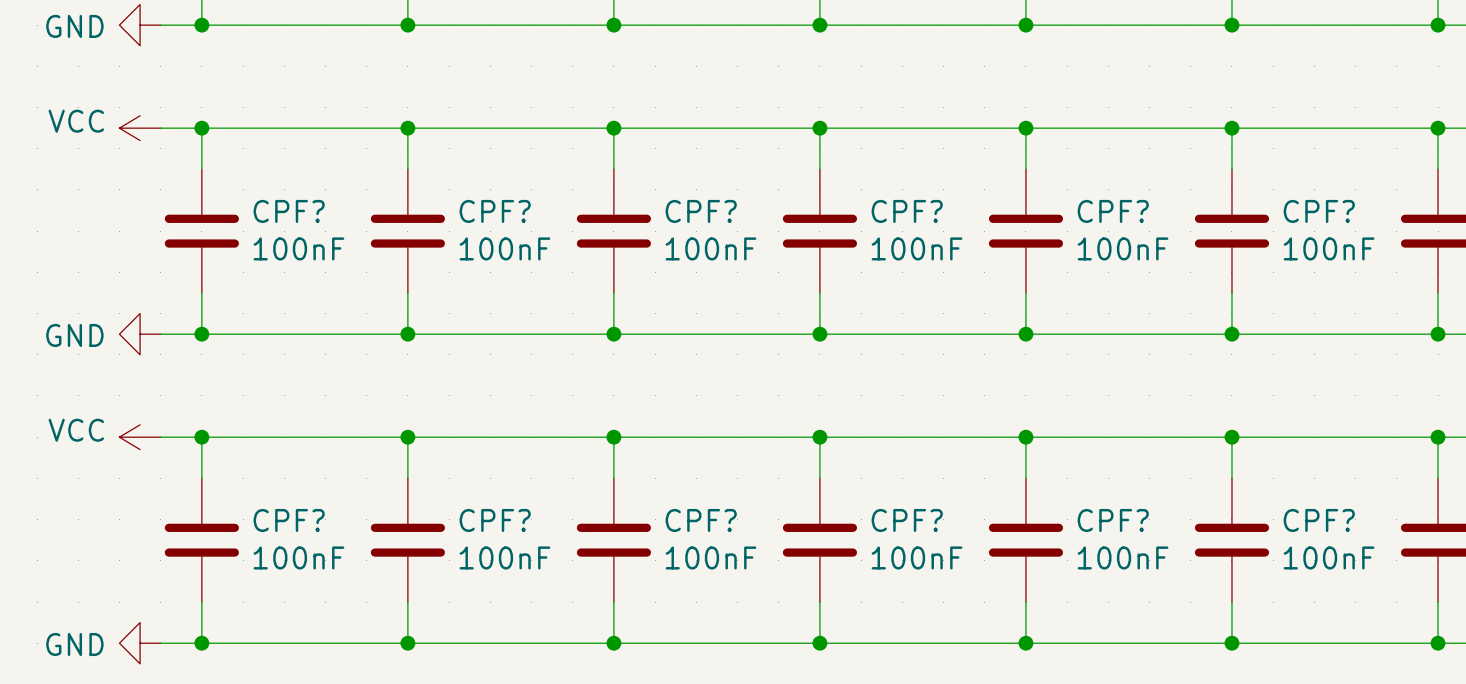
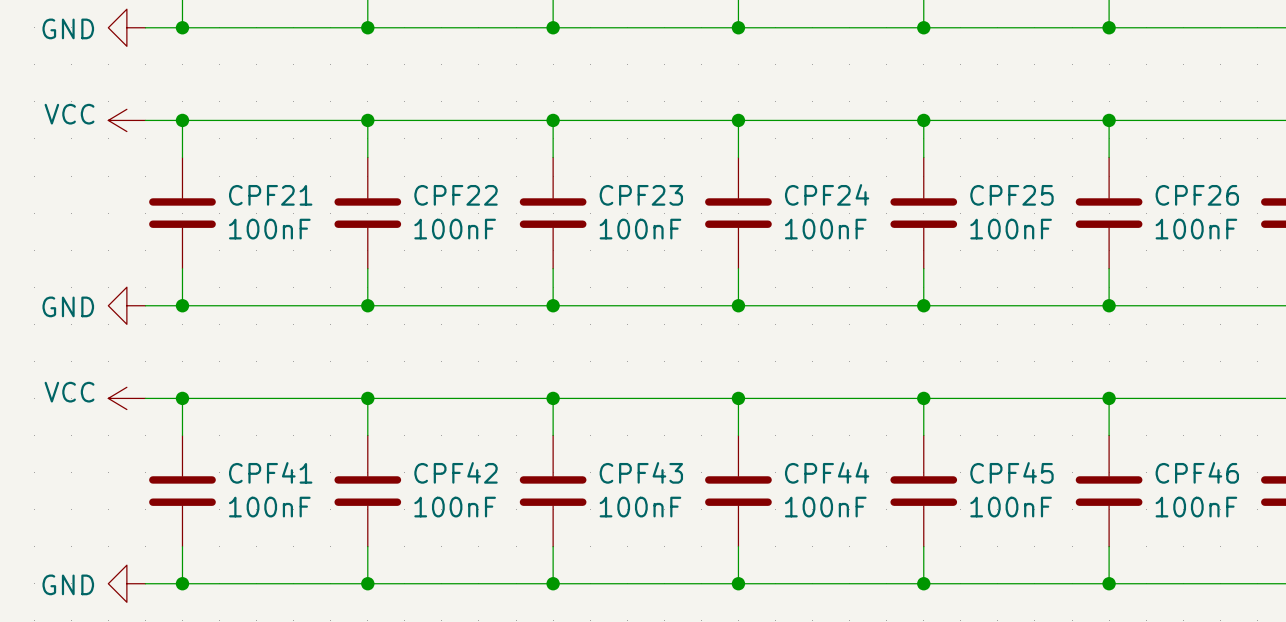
CPF? name: CPF? (289, 211) -> CPF21 (270, 195)
CPF? name: CPF? (495, 211) -> CPF22 (456, 195)
CPF? name: CPF? (701, 211) -> CPF23 (641, 195)
CPF? name: CPF? (907, 211) -> CPF24 (827, 194)
CPF? name: CPF? (1113, 211) -> CPF25 (1011, 195)
CPF? name: CPF? (1319, 211) -> CPF26 (1197, 195)
CPF? name: CPF? (289, 520) -> CPF41 (270, 472)
CPF? name: CPF? (495, 520) -> CPF42 (456, 472)
CPF? name: CPF? (701, 520) -> CPF43 (641, 472)
CPF? name: CPF? (907, 520) -> CPF44 (827, 472)
CPF? name: CPF? (1113, 520) -> CPF45 (1011, 472)
CPF? name: CPF? (1319, 520) -> CPF46 (1197, 472)

